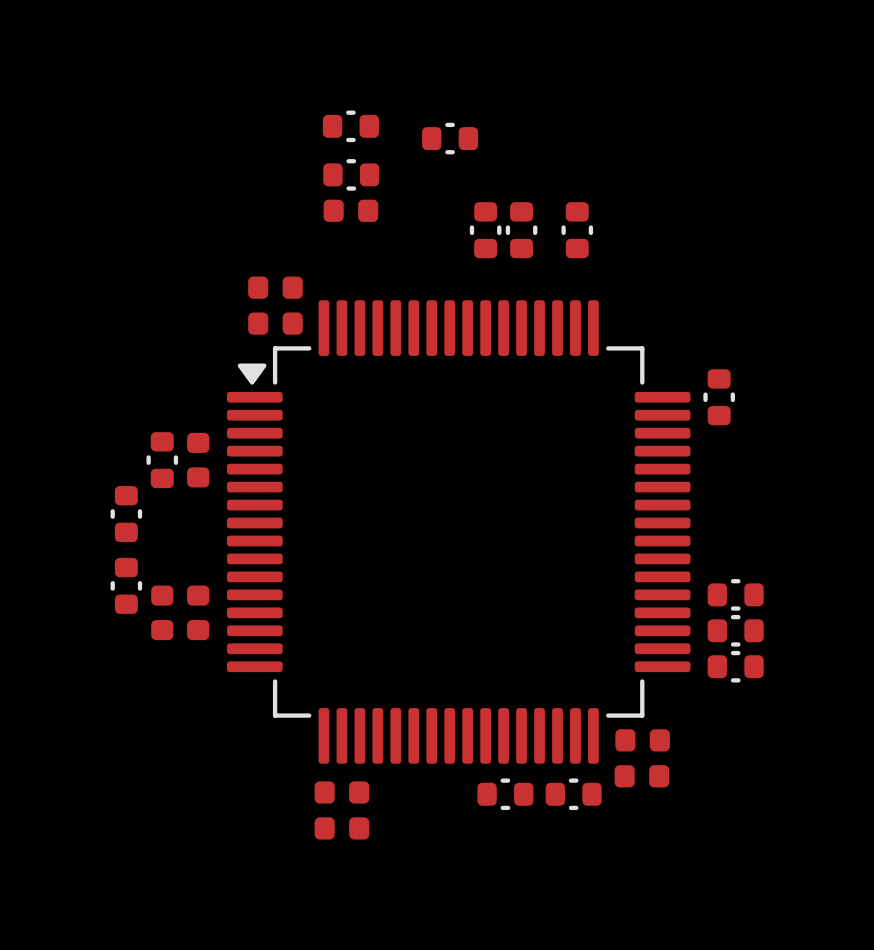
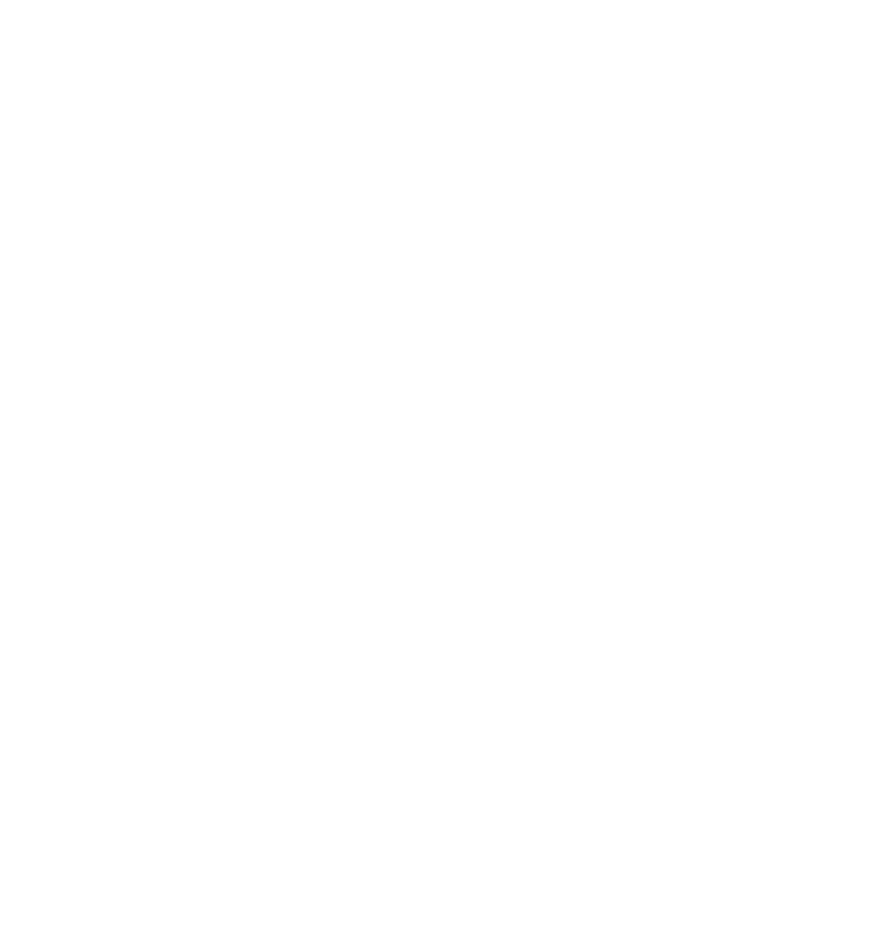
part: (350, 126) -> none
part: (450, 138) -> none
part: (351, 174) -> none
part: (350, 210) -> none
part: (485, 230) -> none
part: (521, 230) -> none
part: (577, 230) -> none
part: (275, 287) -> none
part: (275, 323) -> none
part: (719, 397) -> none
part: (162, 460) -> none
part: (198, 460) -> none
part: (126, 514) -> none
part: (458, 531) -> none
part: (126, 585) -> none
part: (735, 594) -> none
part: (162, 612) -> none
part: (198, 612) -> none
part: (735, 630) -> none
part: (735, 666) -> none
part: (642, 740) -> none
part: (641, 776) -> none
part: (341, 792) -> none
part: (505, 794) -> none
part: (573, 794) -> none
part: (341, 828) -> none

